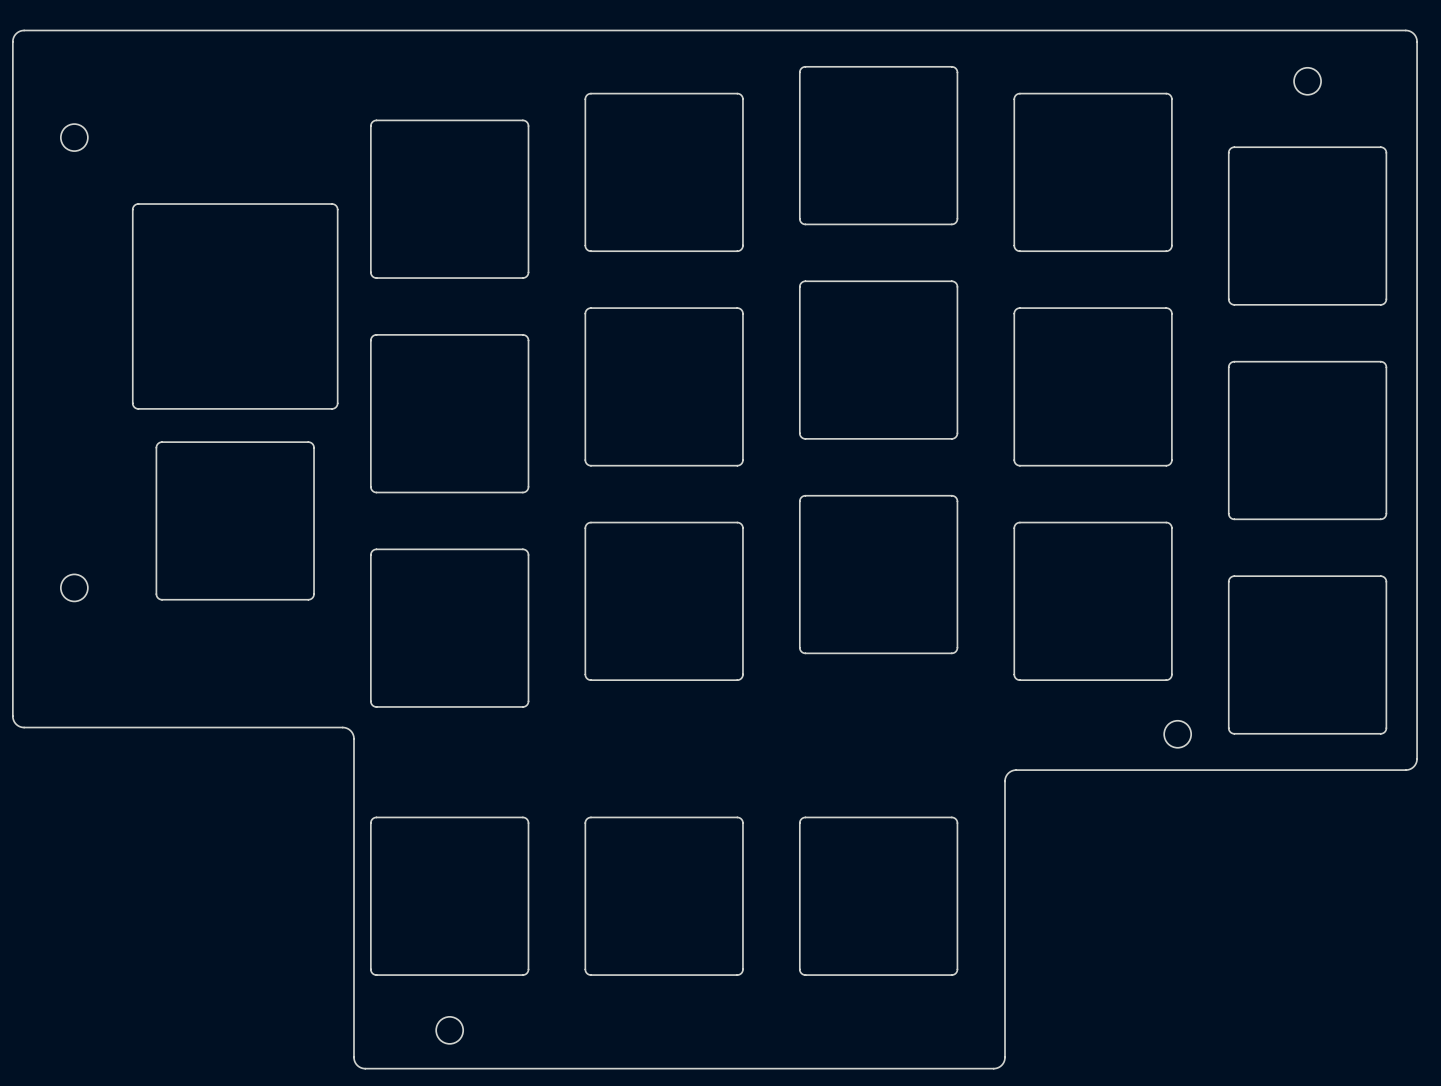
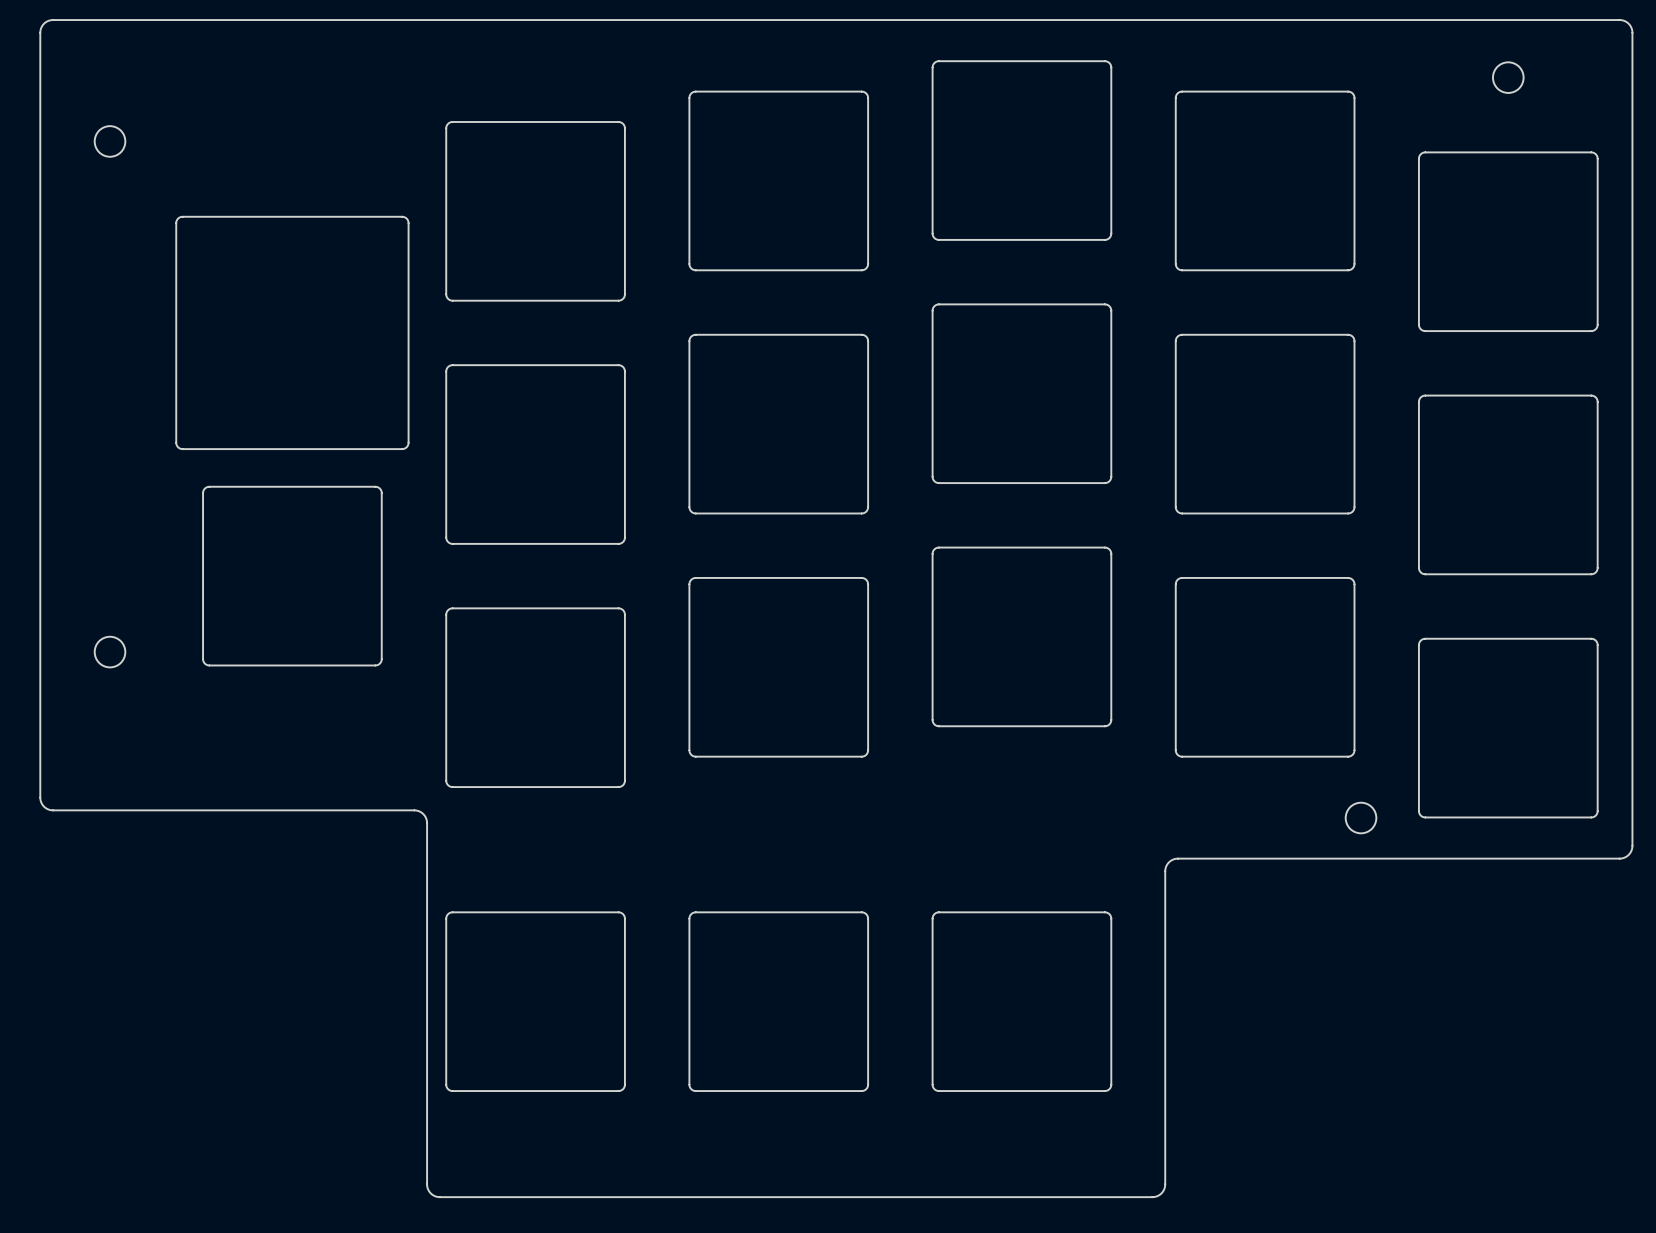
round board edge: [435, 1016, 465, 1045] -> none

